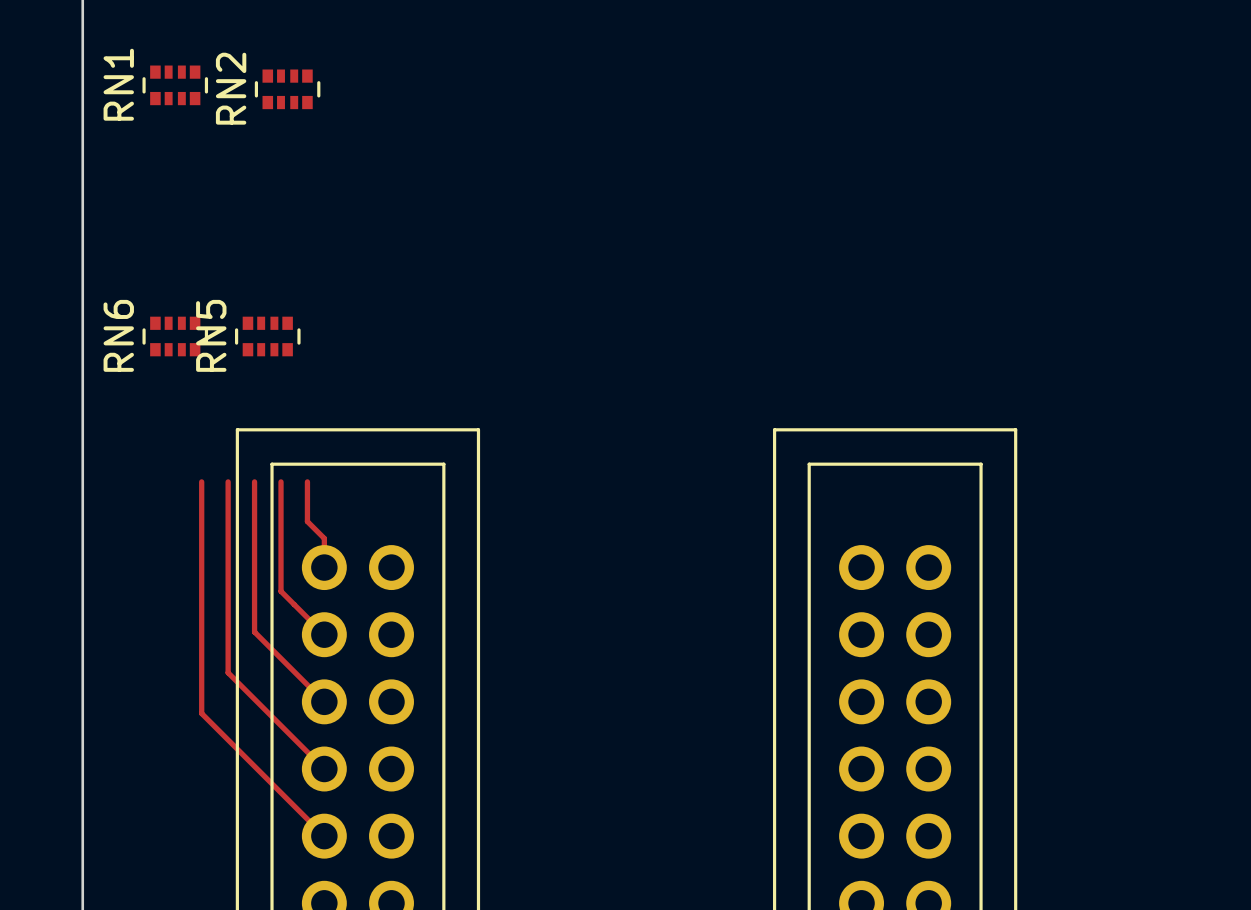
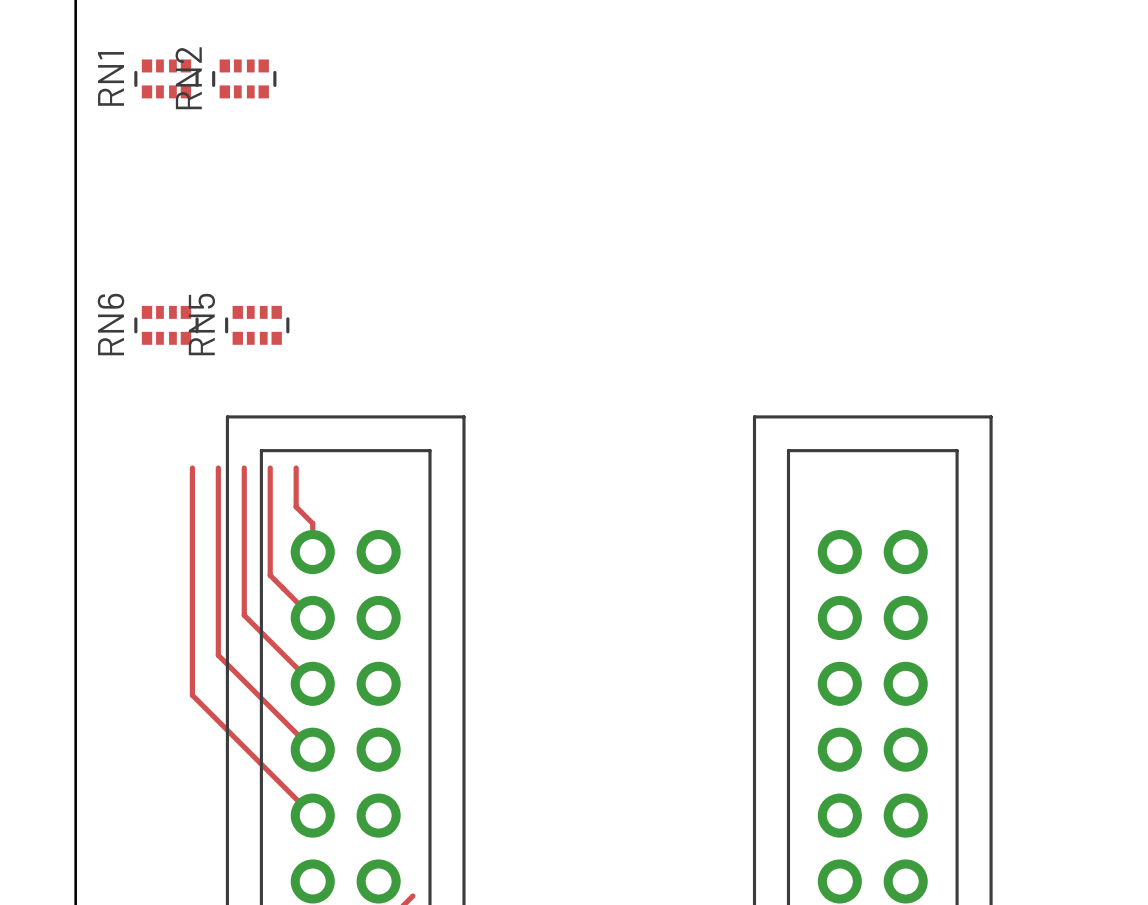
RN2 position: (287, 89) -> (244, 78)

